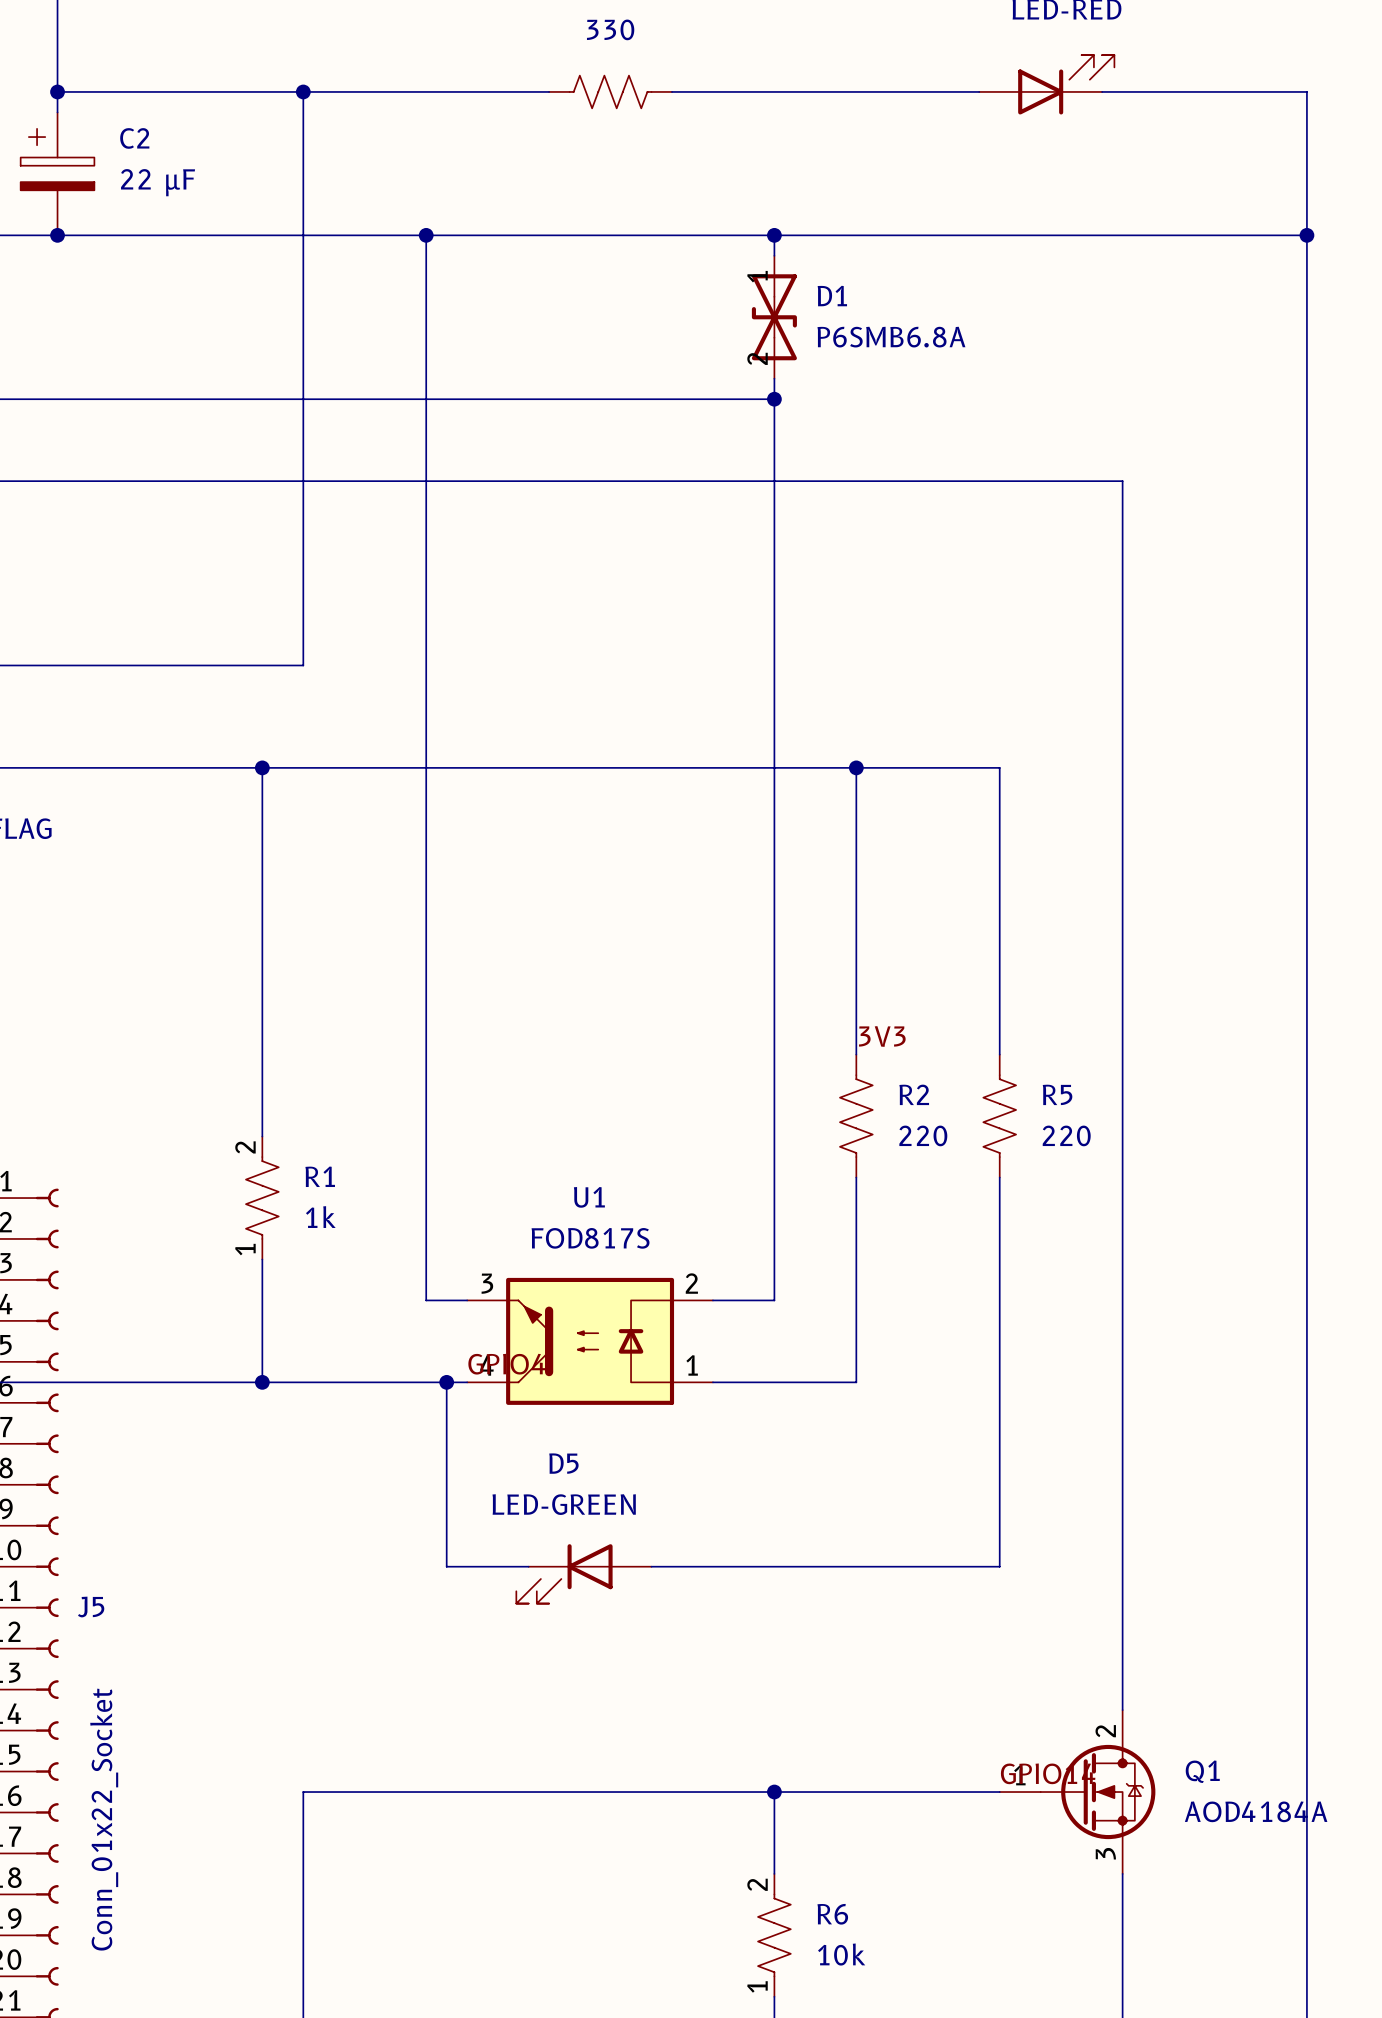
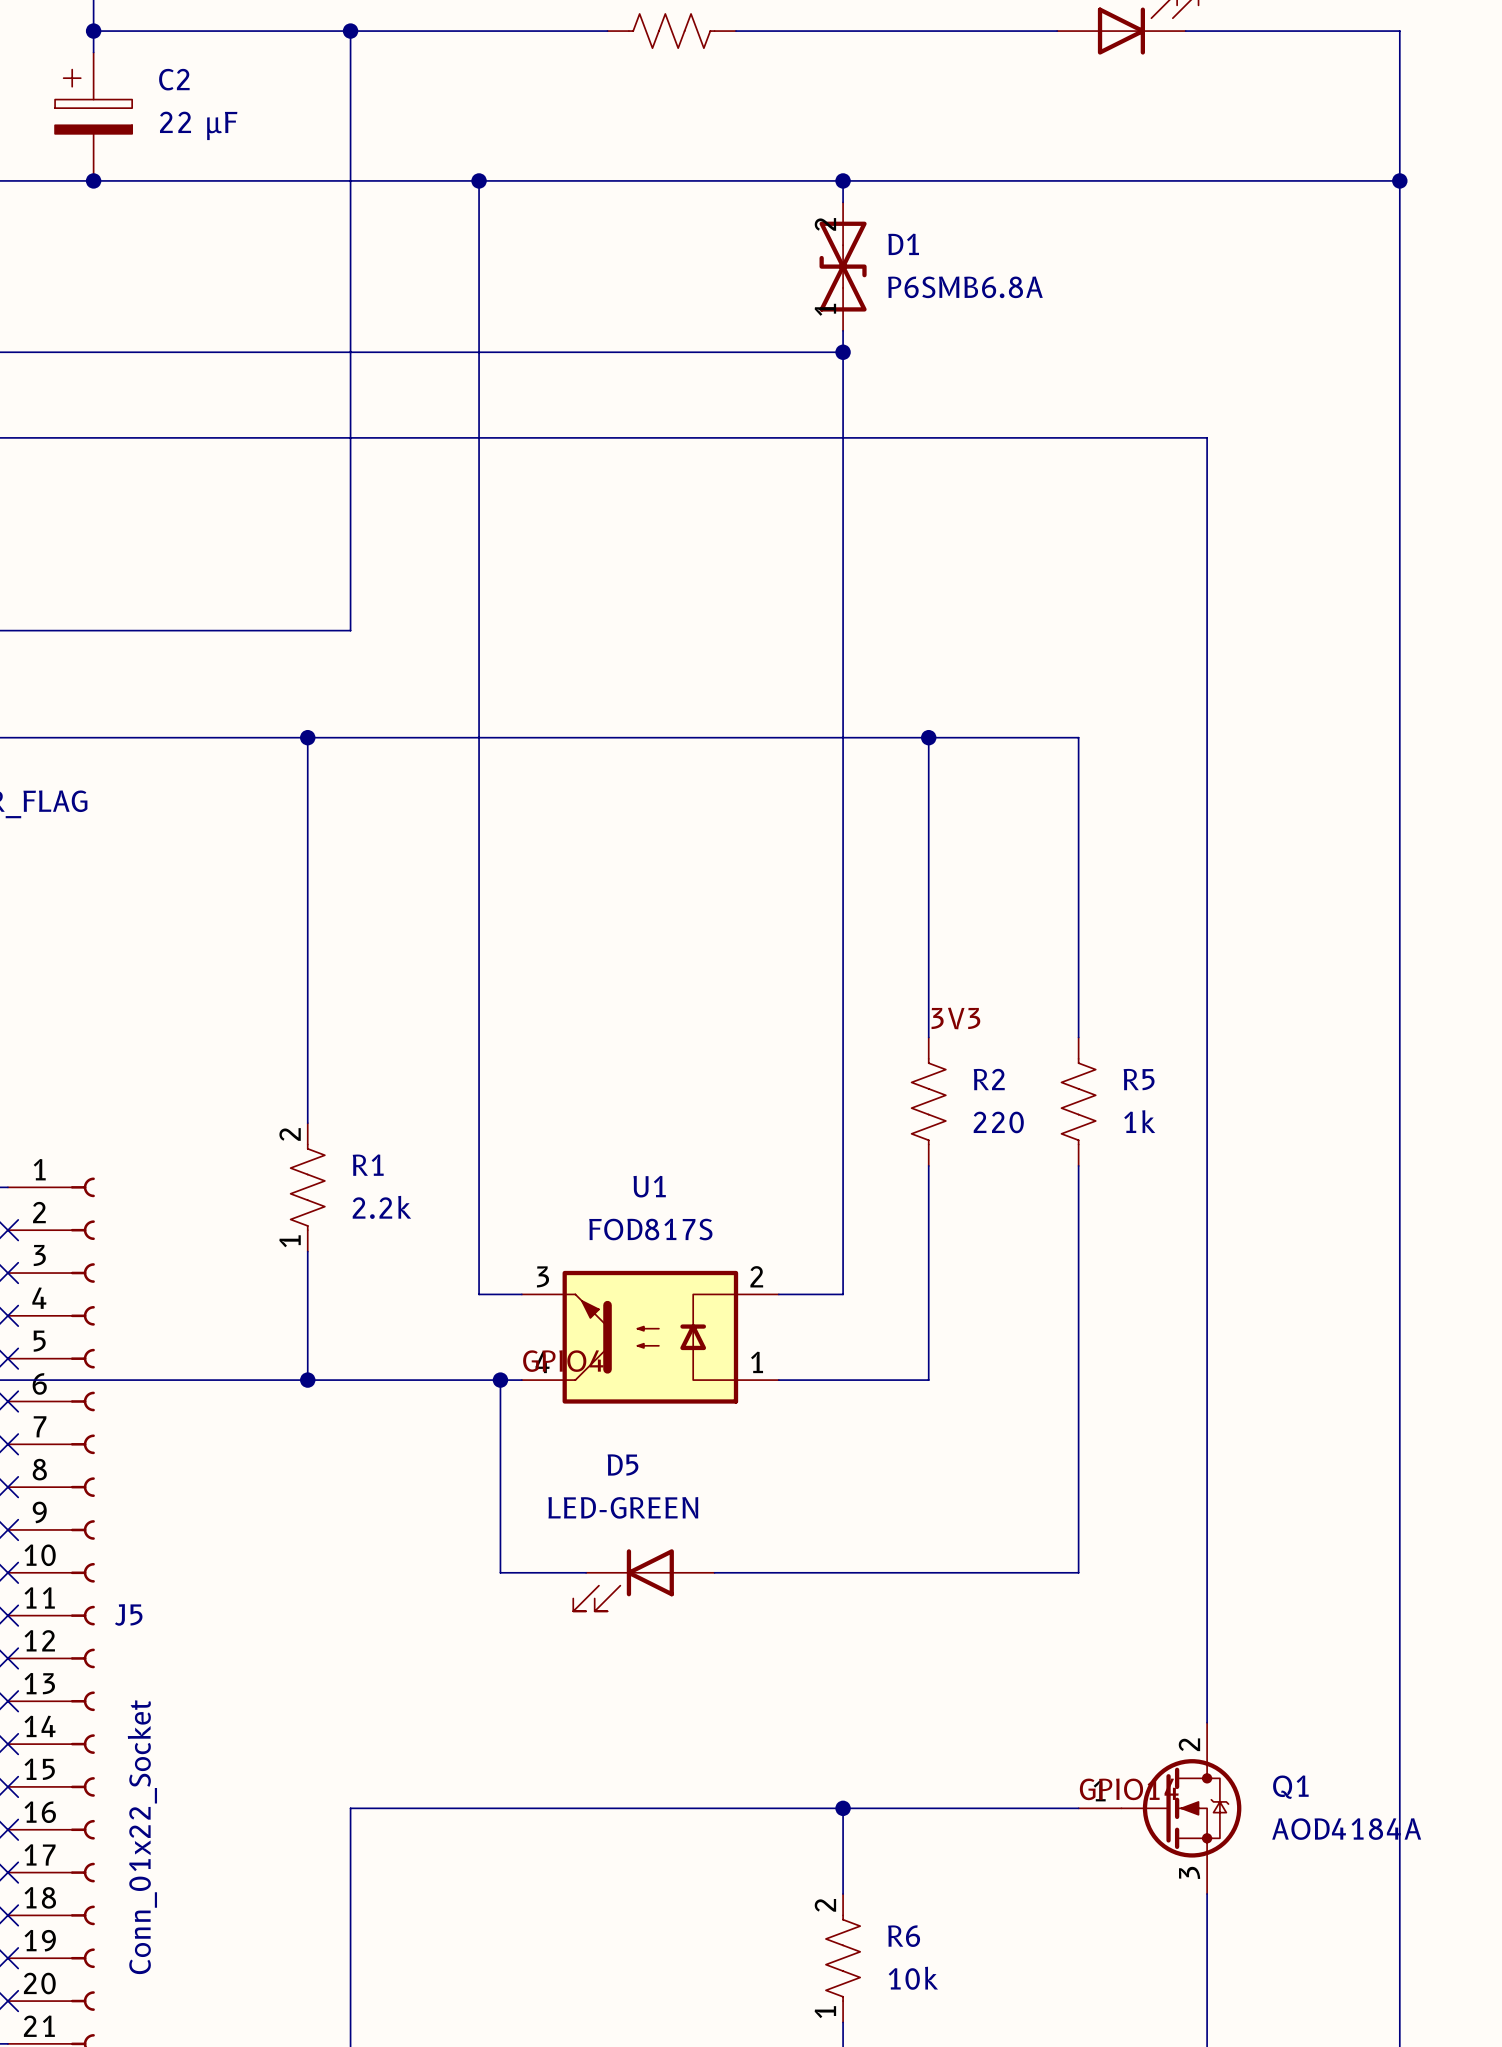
D1 rotation: 0° (774, 317) -> 180° (843, 266)
R5 value: 220 (1066, 1135) -> 1k (1139, 1121)
R1 value: 1k (320, 1217) -> 2.2k (381, 1207)

